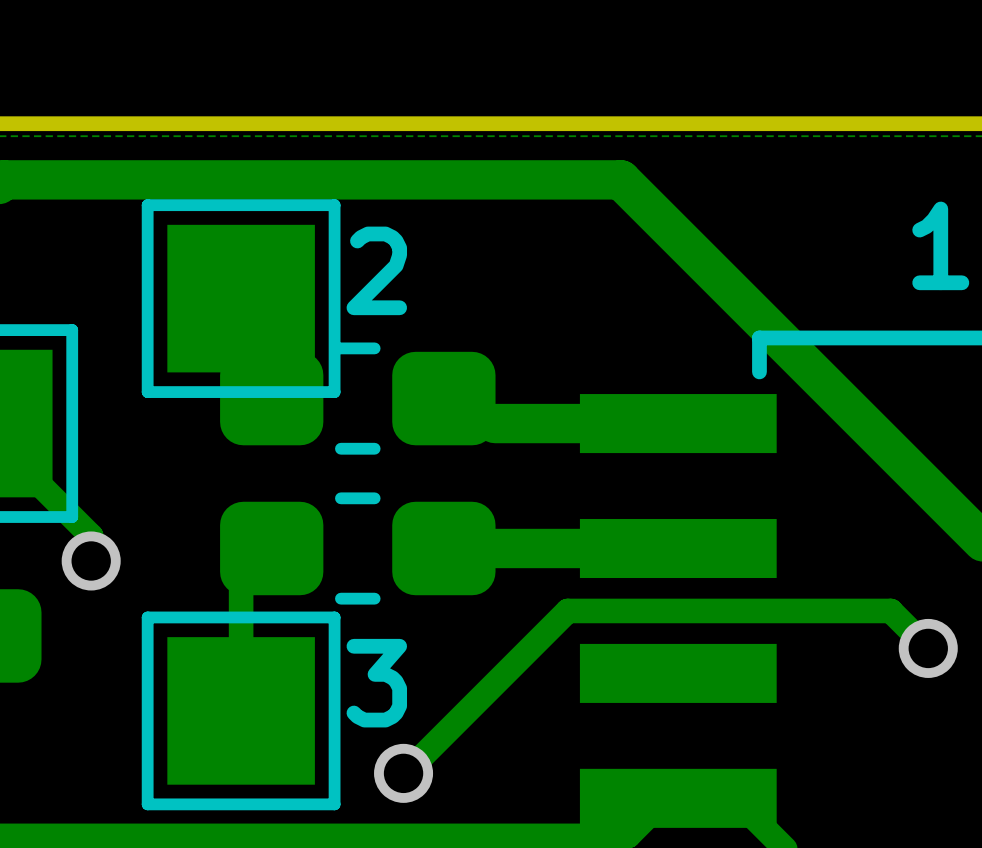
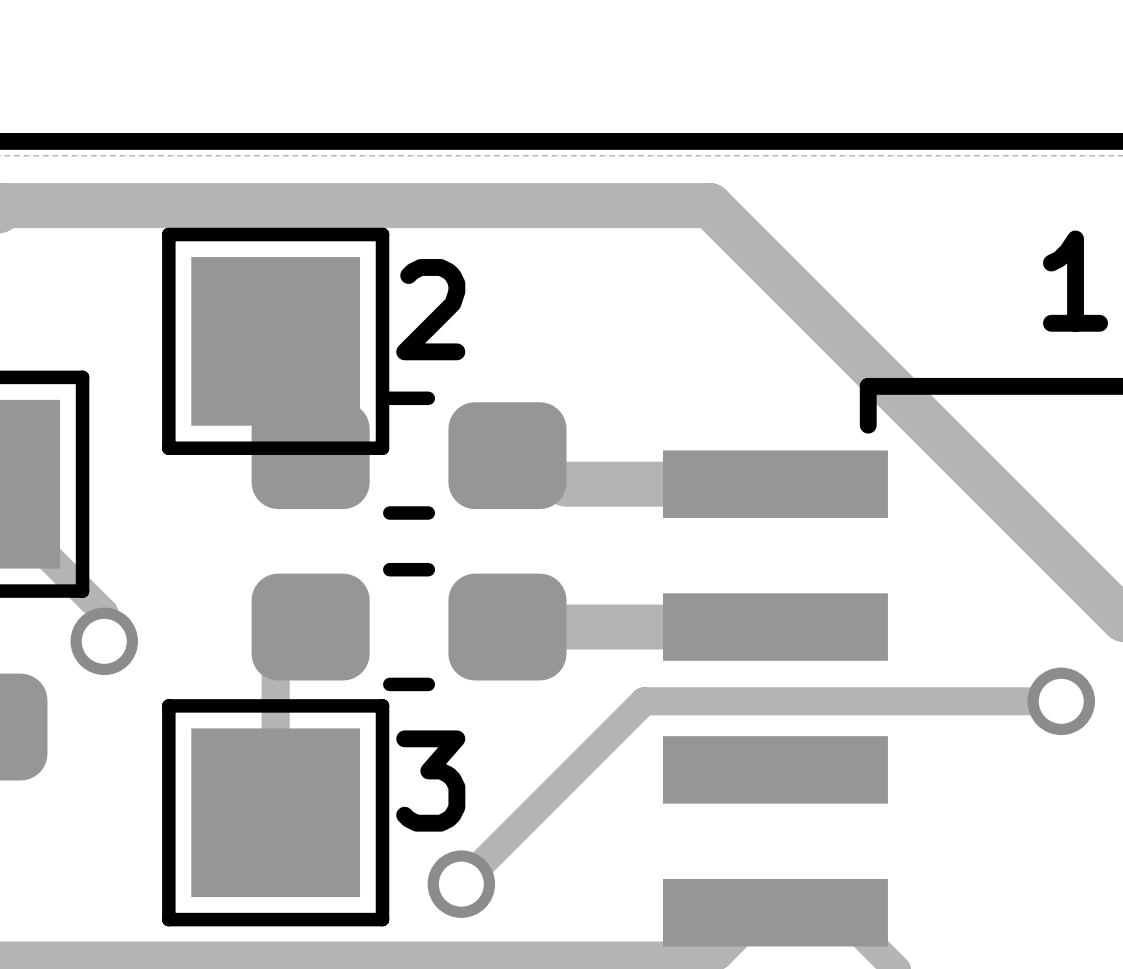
track: (928, 648) (890, 610) (567, 610) (405, 773) -> (1061, 701) (644, 701) (461, 884)
via position: (928, 648) -> (1061, 701)

